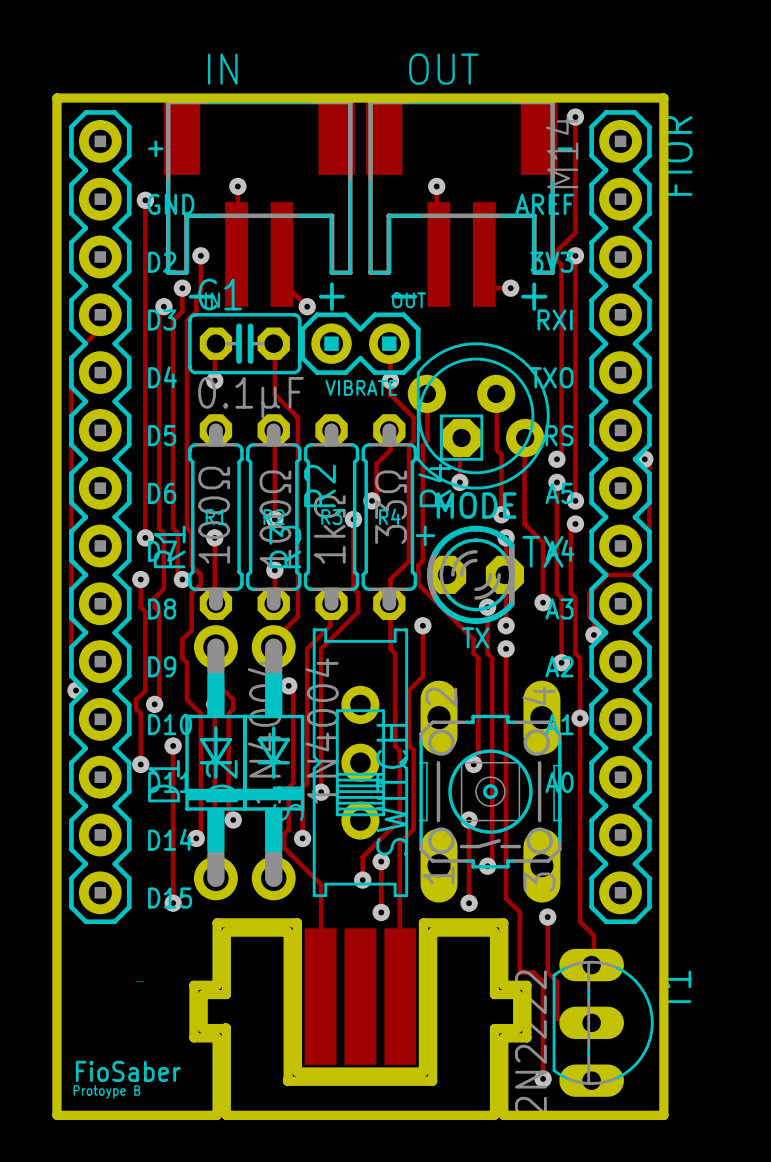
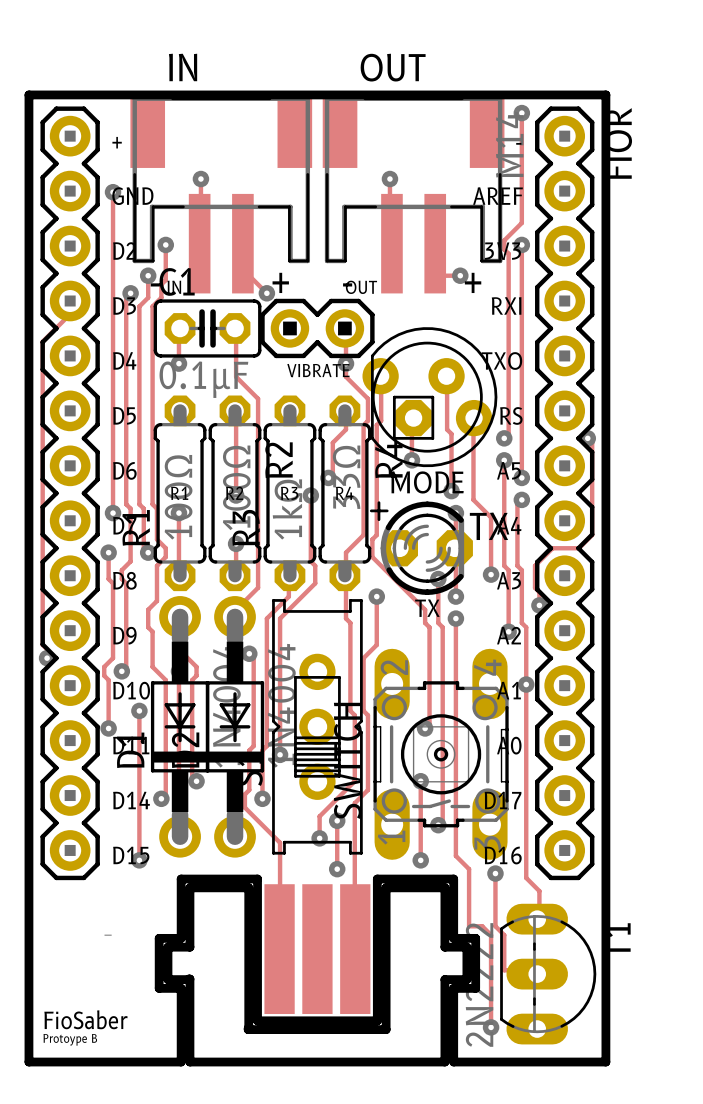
text: none -> D17 (503, 800)
text: none -> D16 (503, 855)

